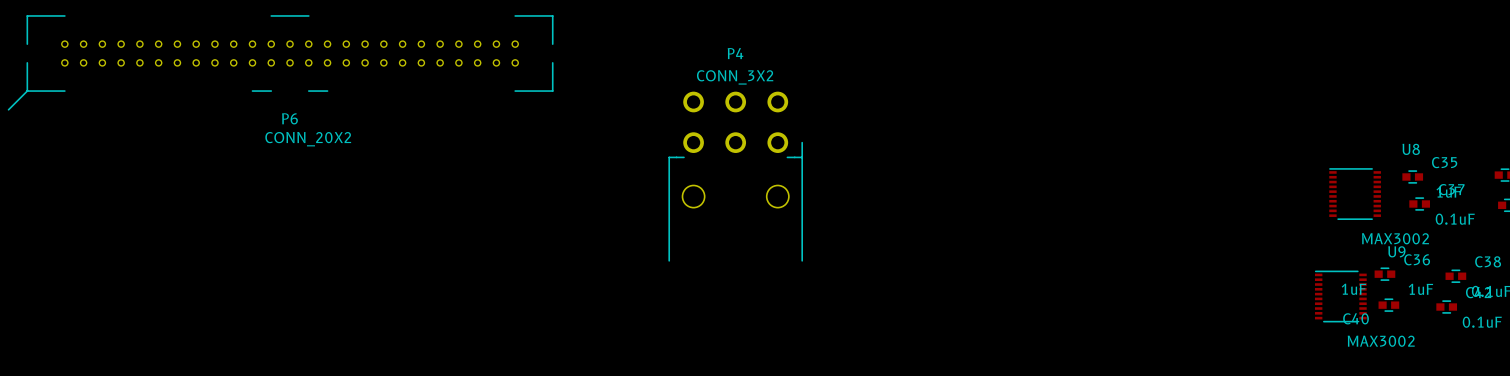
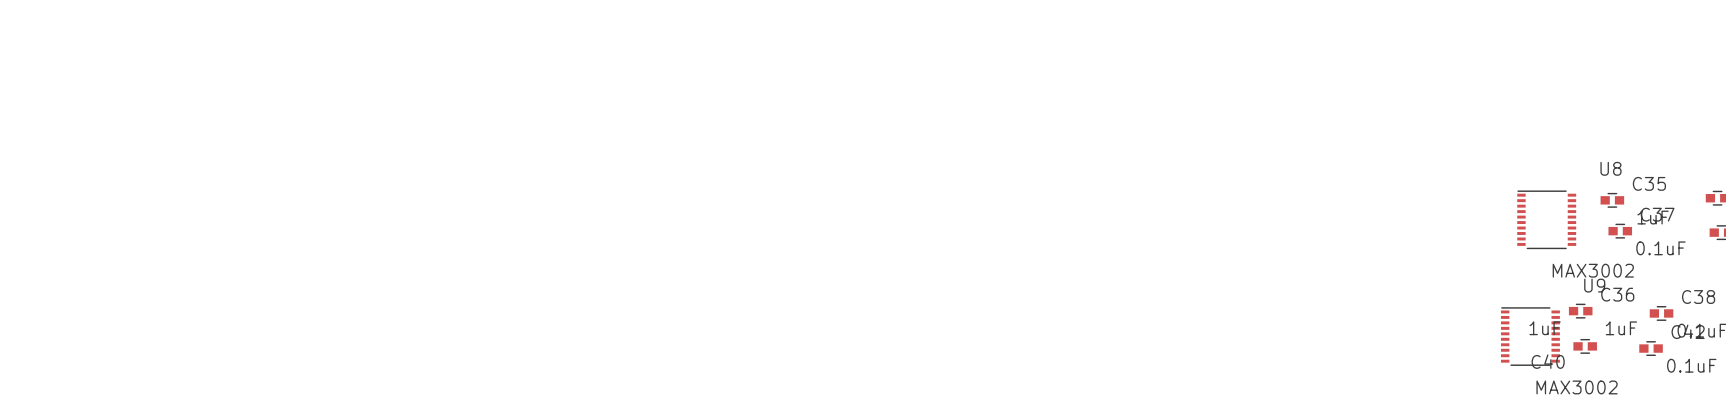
P6: CONN_20X2 (280, 62) -> none
P4: CONN_3X2 (735, 176) -> none

